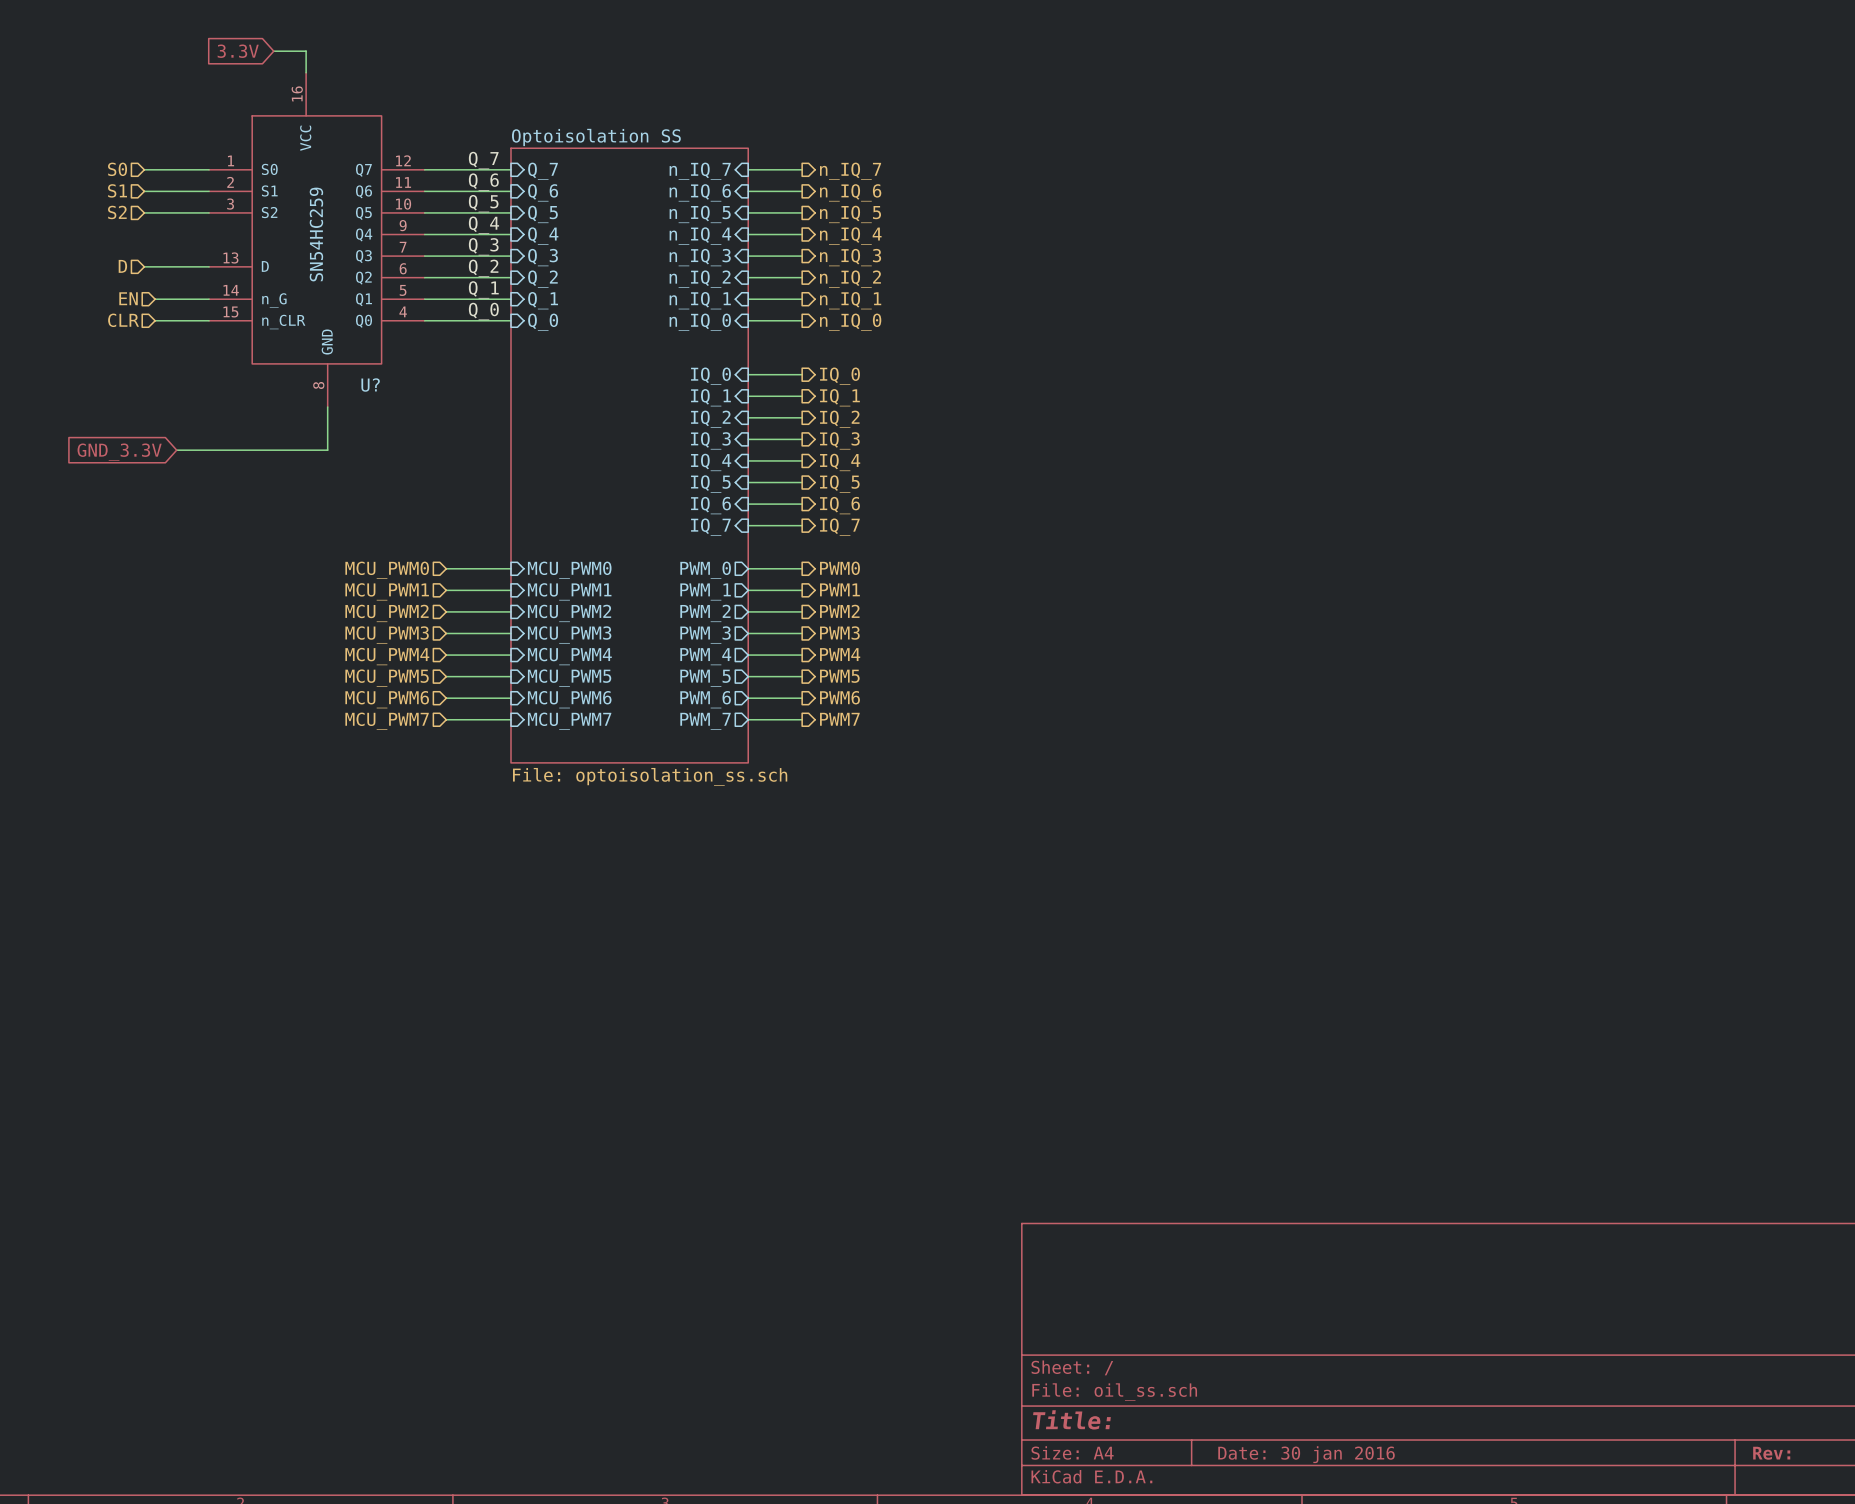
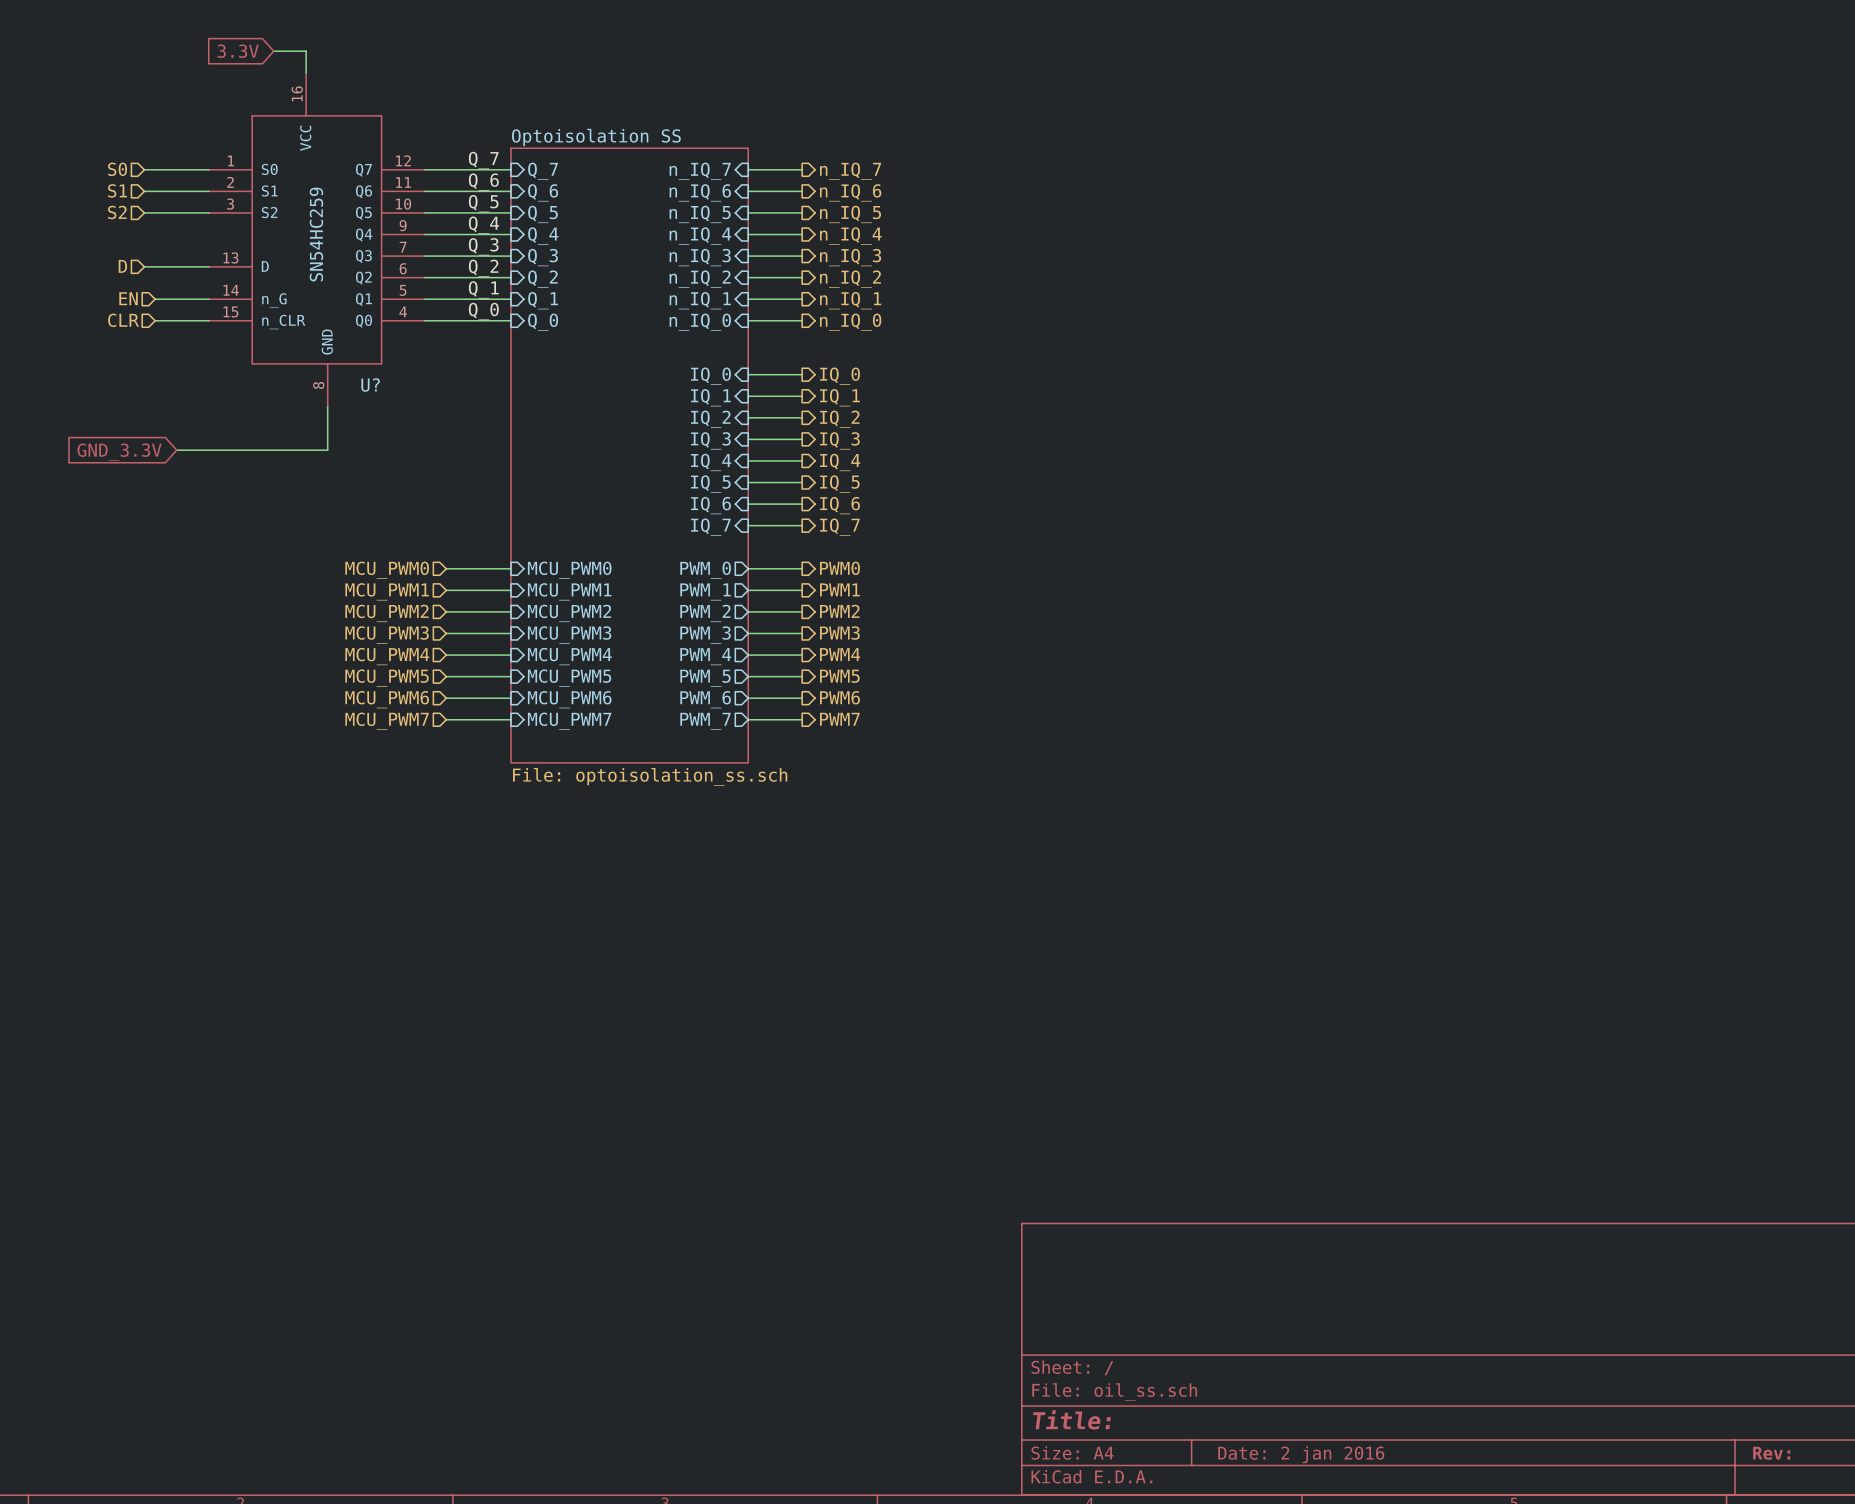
title block: Date: 30 jan 2016 (1306, 1454) -> Date: 2 jan 2016 (1301, 1454)

